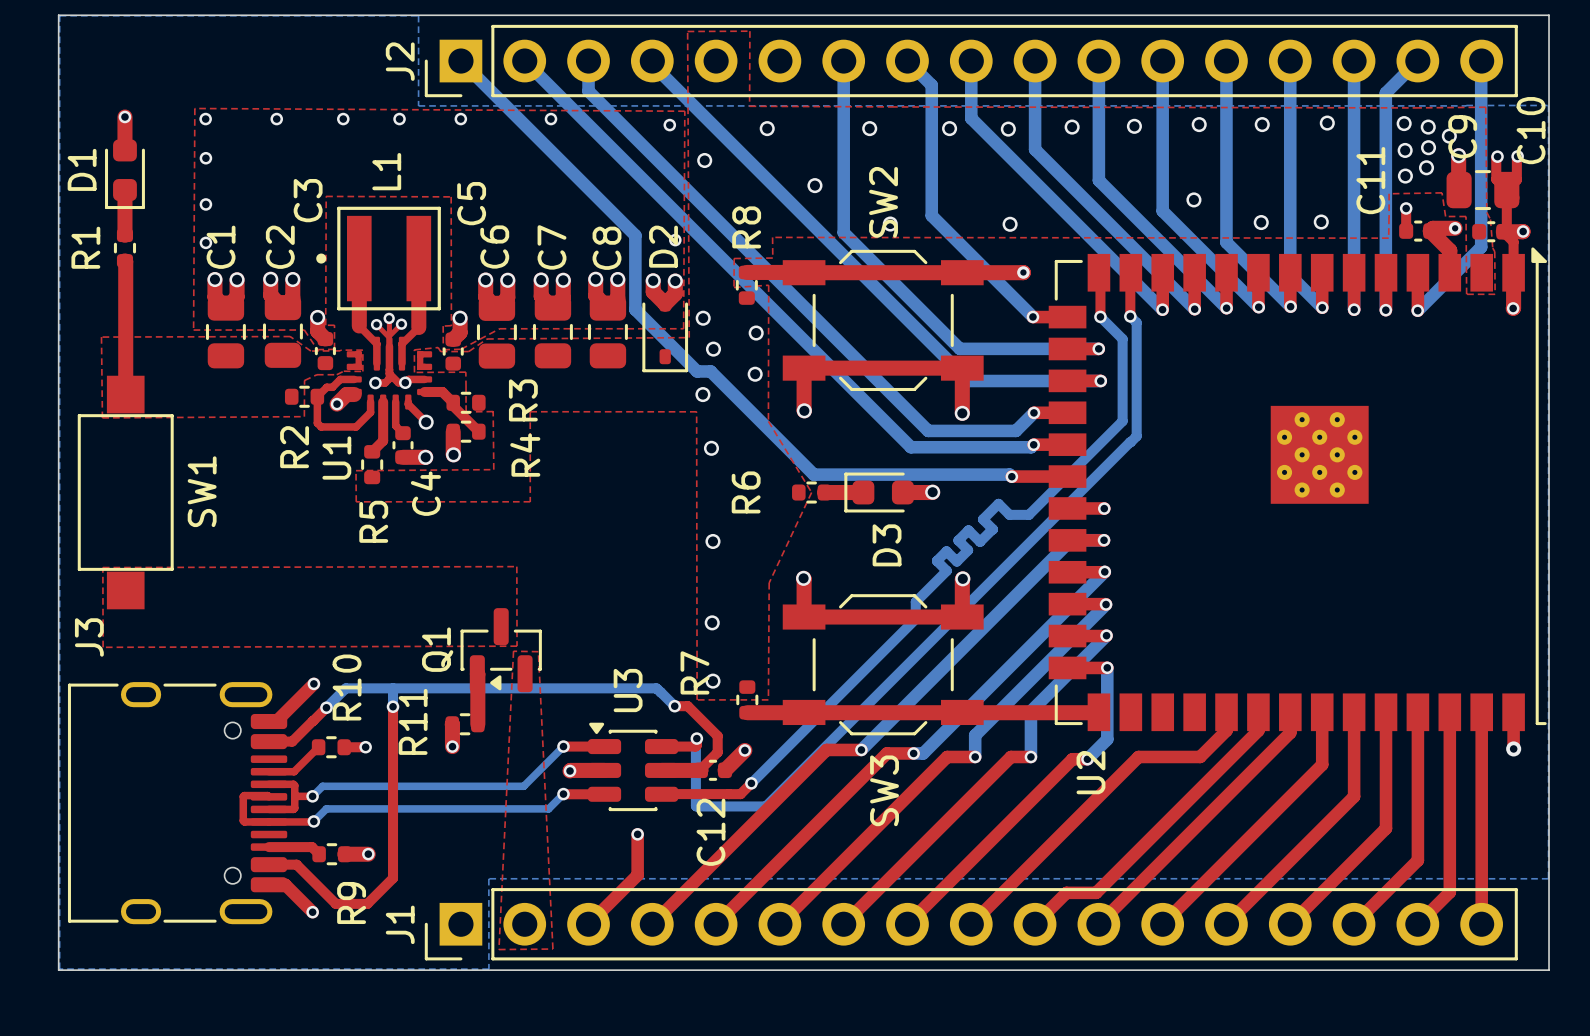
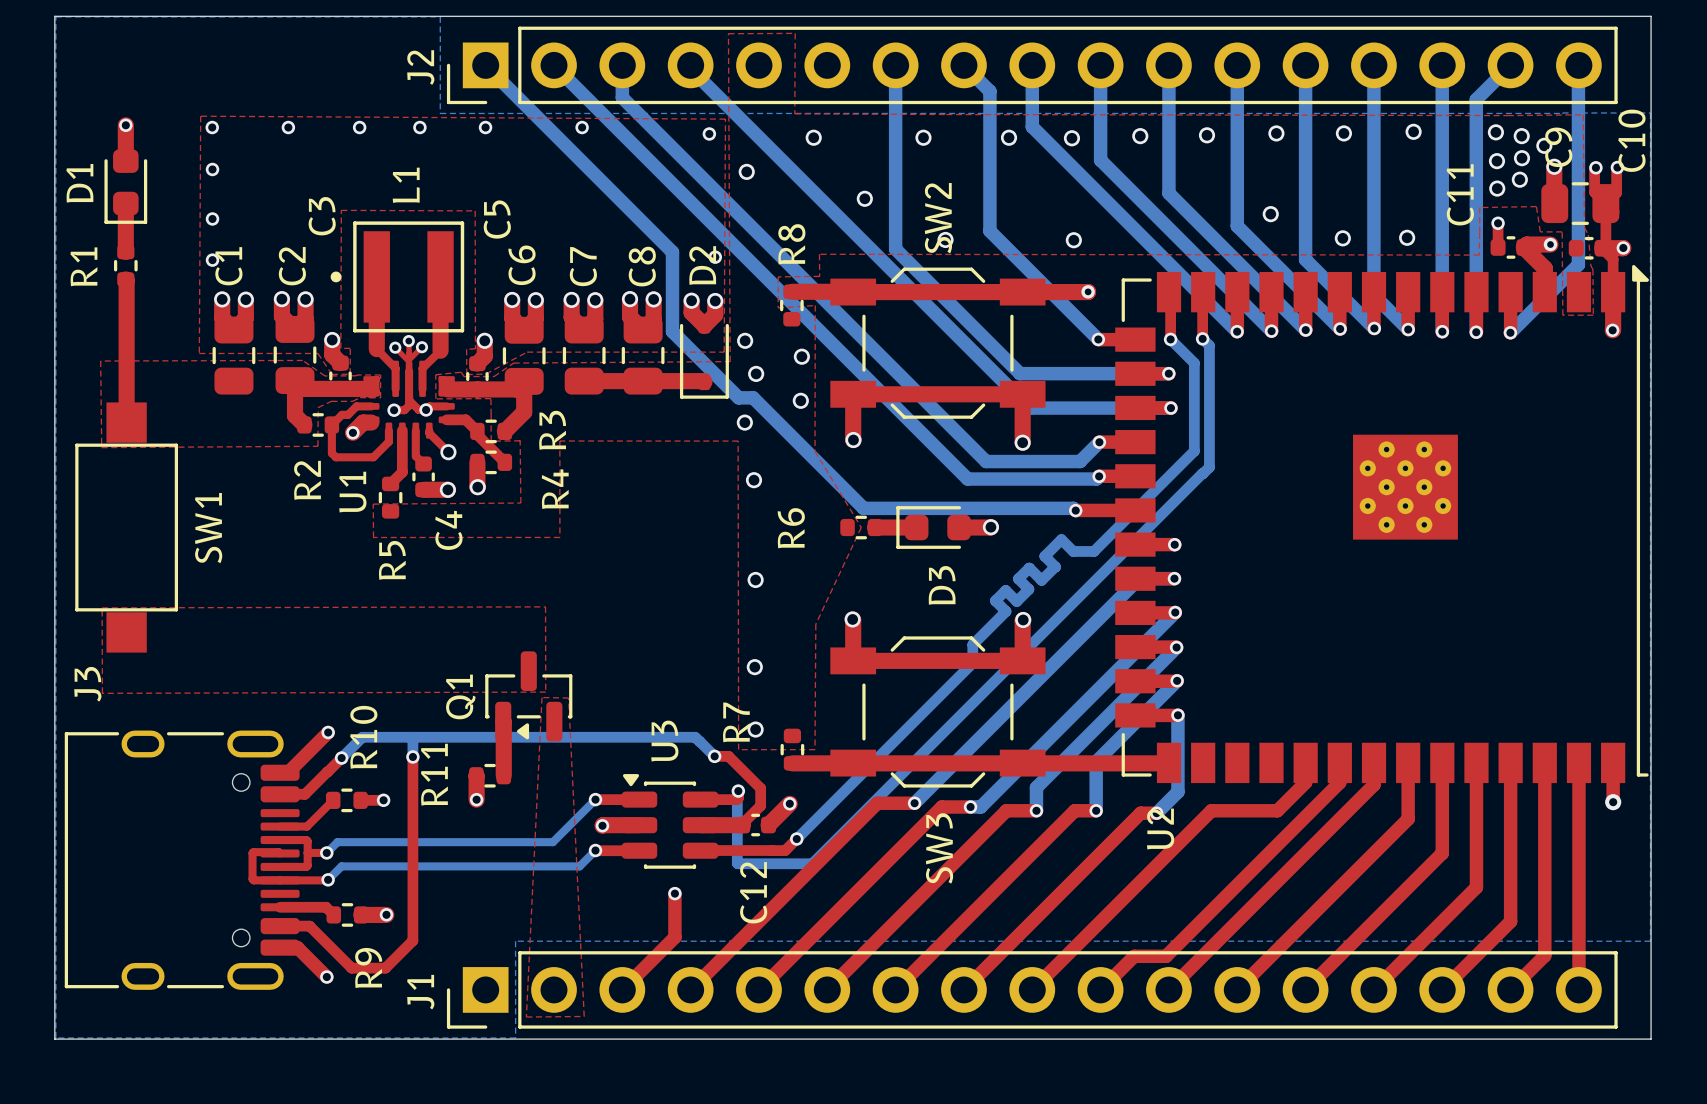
top track: none -> (584, 381) (704, 382)
top track: none -> (448, 389) (516, 389) (524, 381) (524, 412) (504, 431)
top track: none -> (371, 390) (303, 388) (295, 380) (295, 415) (304, 424)

